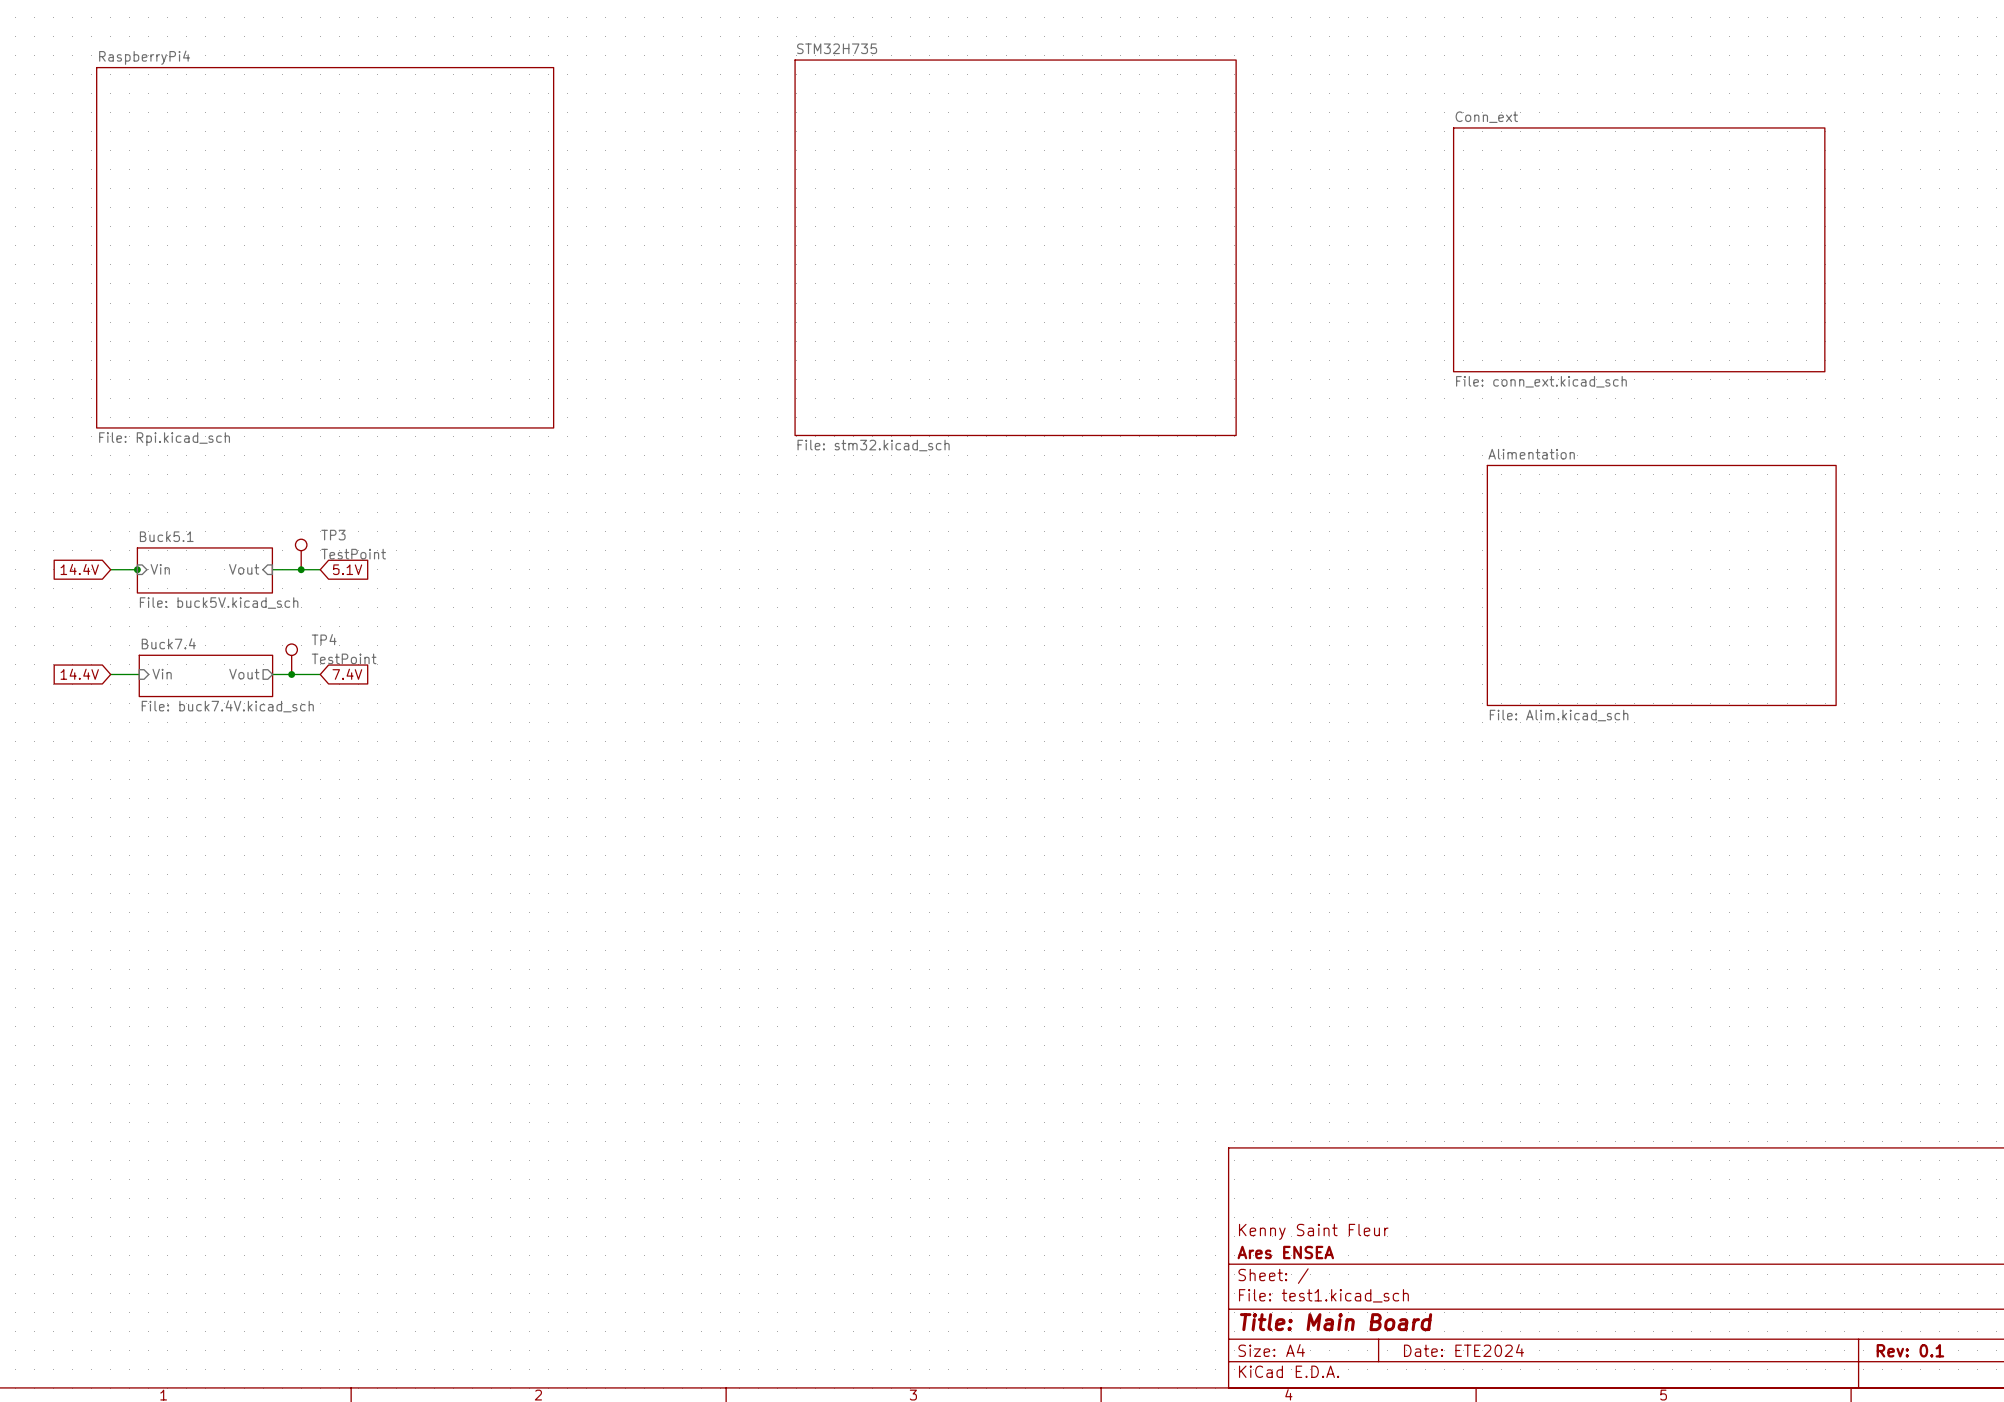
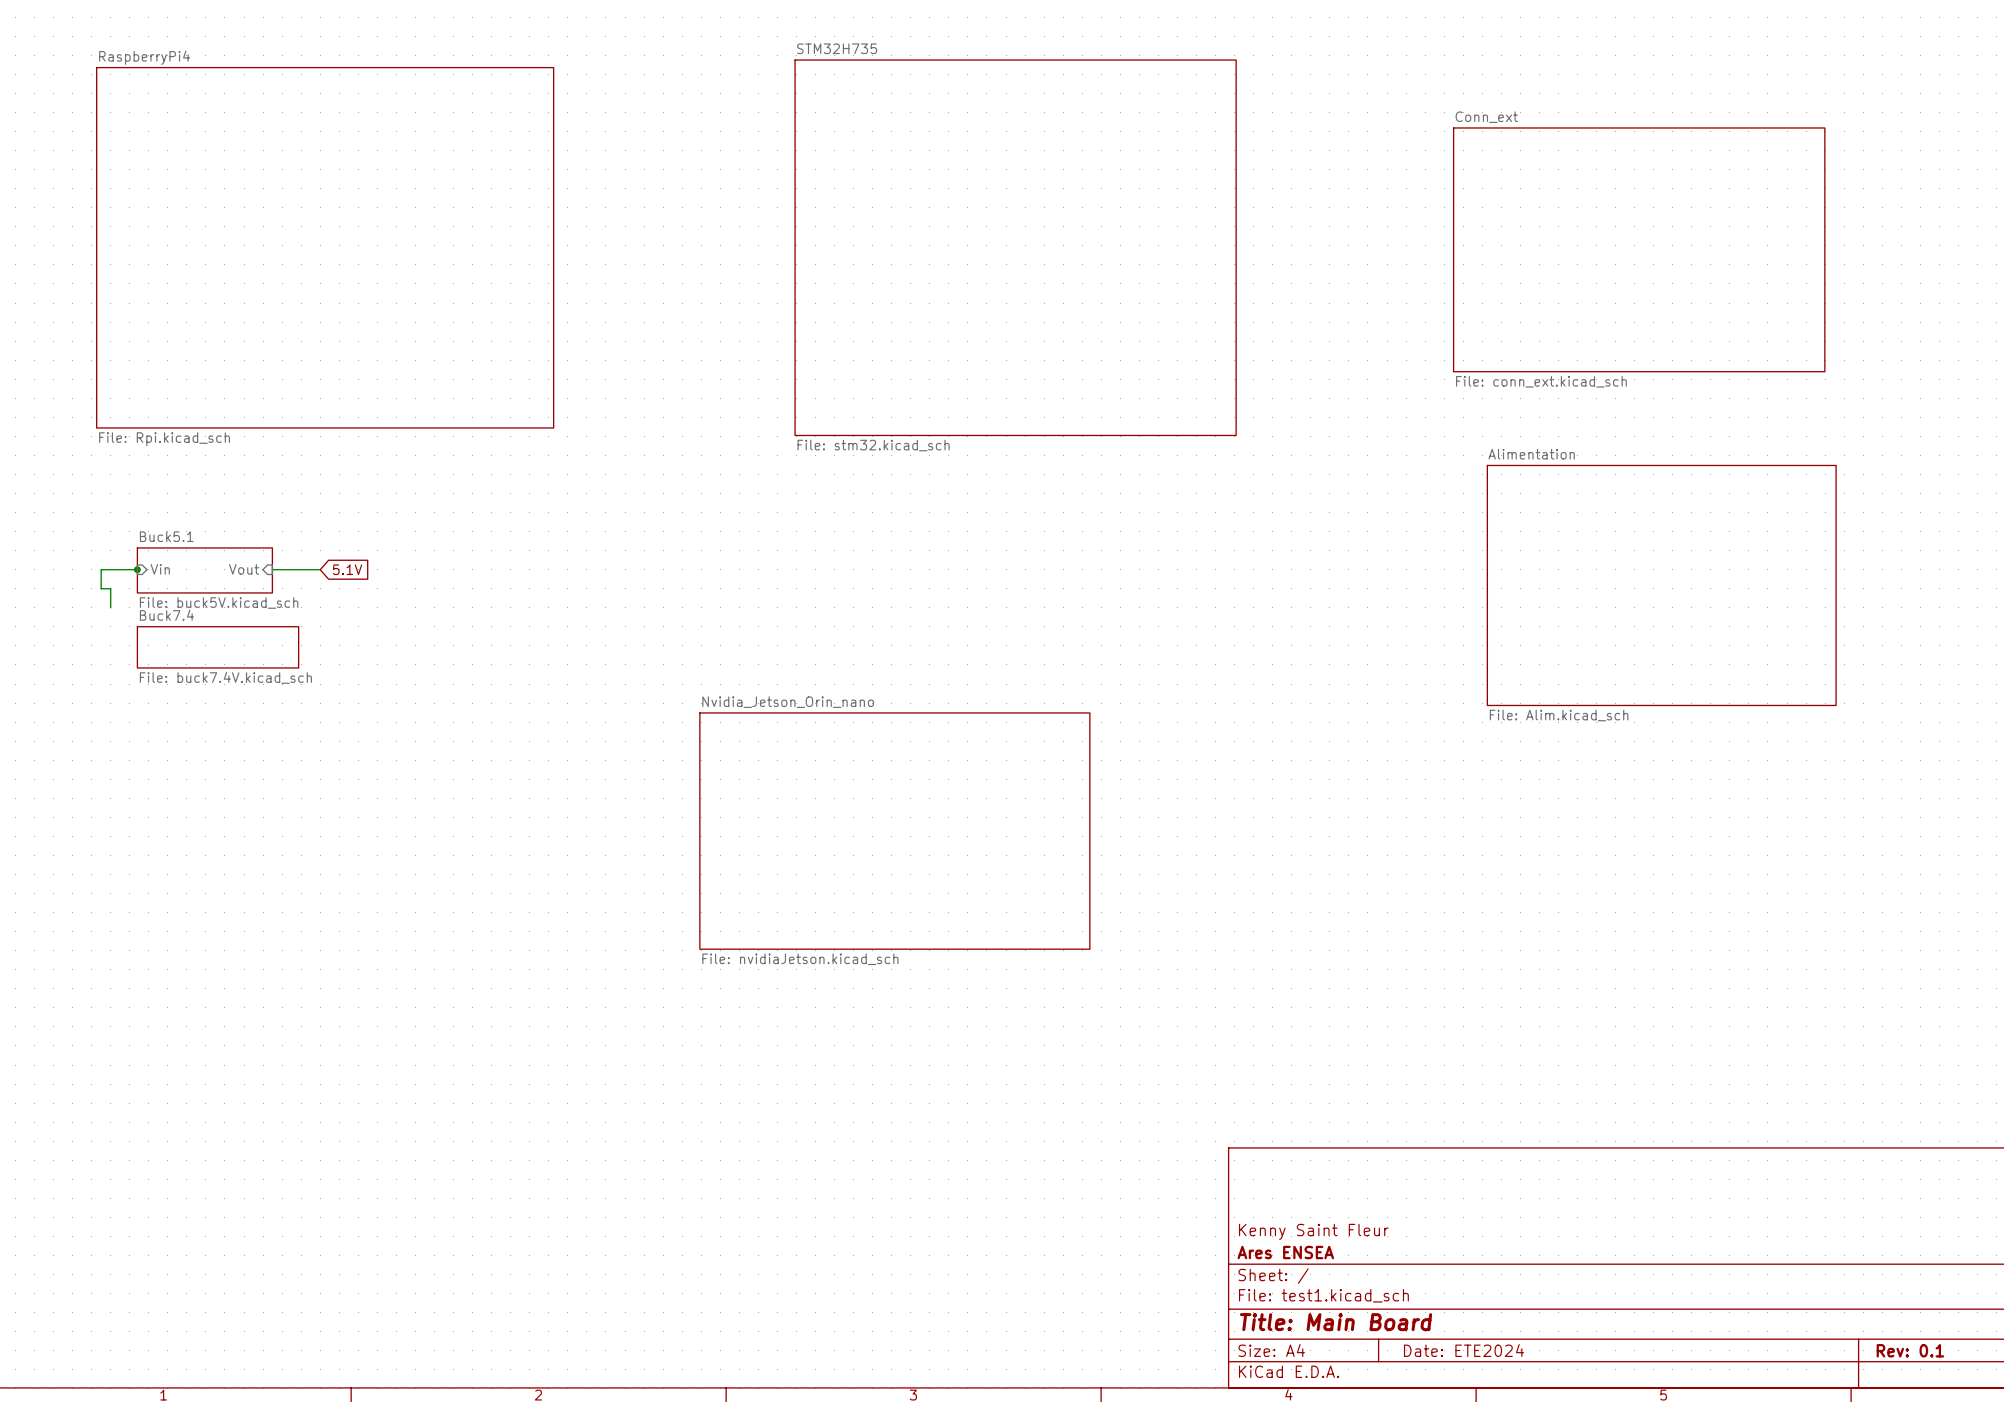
TP3: TestPoint (301, 554) -> none
global label: 14.4V (79, 569) -> none
wire: none -> (110, 569) (101, 569) (101, 588) (110, 588) (110, 607)
junction: (301, 569) -> none
sheet Buck7.4 shape: [138, 654, 274, 698] -> [136, 626, 300, 669]
TP4: TestPoint (291, 659) -> none
global label: 14.4V (79, 674) -> none
wire: (110, 674) (139, 674) -> none
sheet pin: Vin (162, 674) -> none
sheet pin: Vout (244, 674) -> none
wire: (272, 674) (320, 674) -> none
junction: (291, 674) -> none
global label: 7.4V (347, 674) -> none
sheet Nvidia_Jetson_Orin_nano: none -> File: nvidiaJetson.kicad_sch (894, 831)

